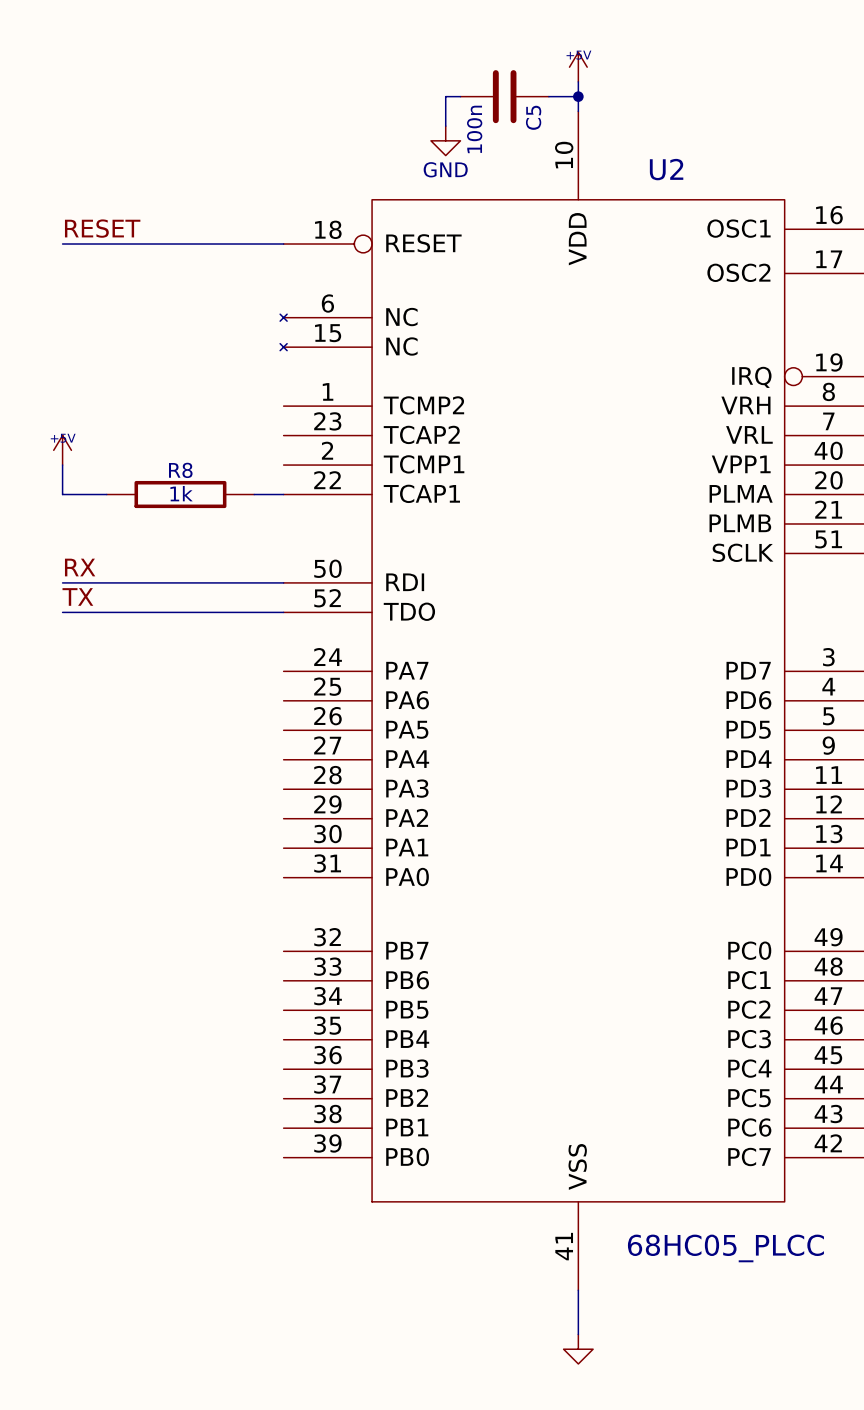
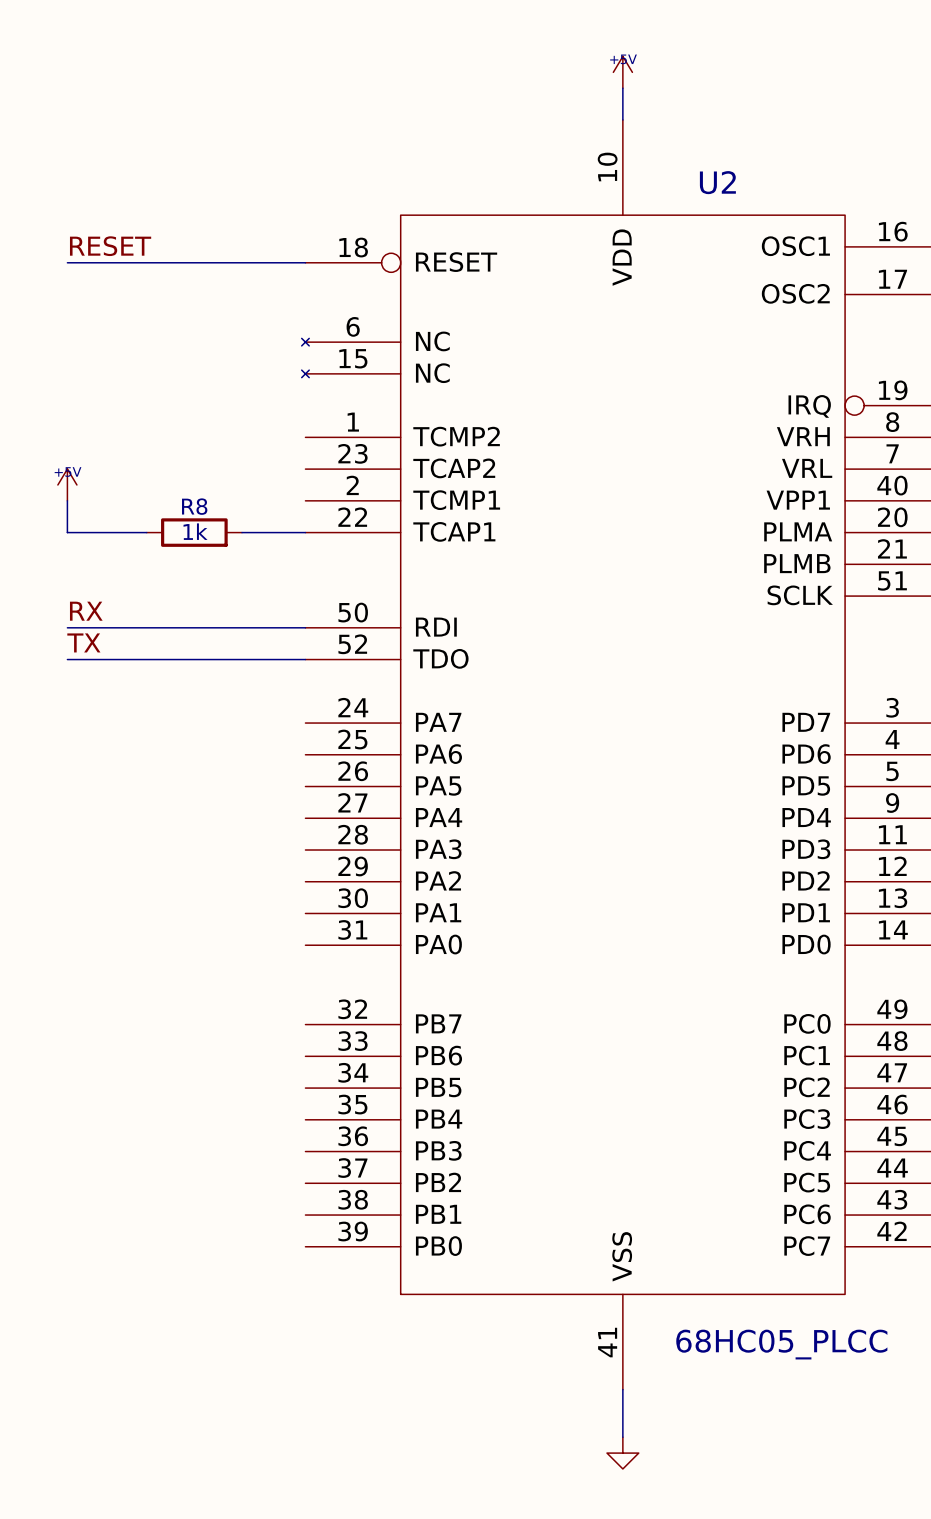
wire: (460, 96) (445, 96) (445, 126) -> none
C5: 100n (504, 96) -> none
wire: (548, 96) (578, 96) -> none
junction: (578, 96) -> none
power symbol: GND (445, 140) -> none
R8 symbol: [106, 480, 255, 509] -> [146, 518, 242, 547]

